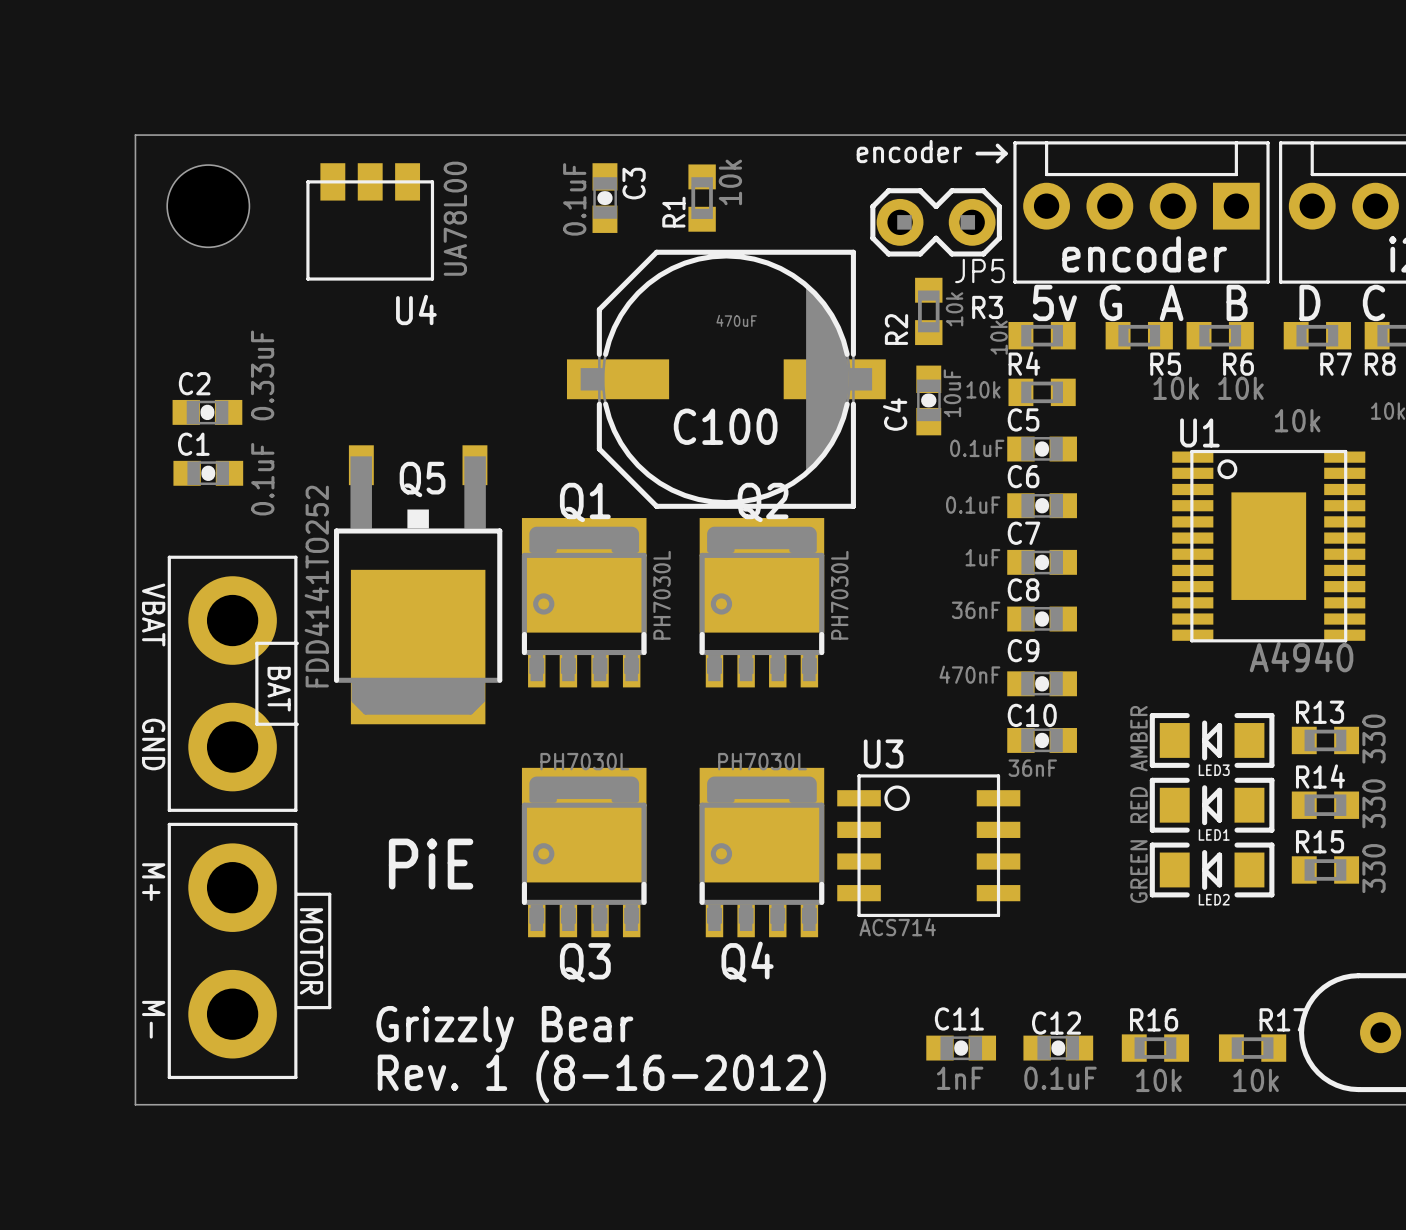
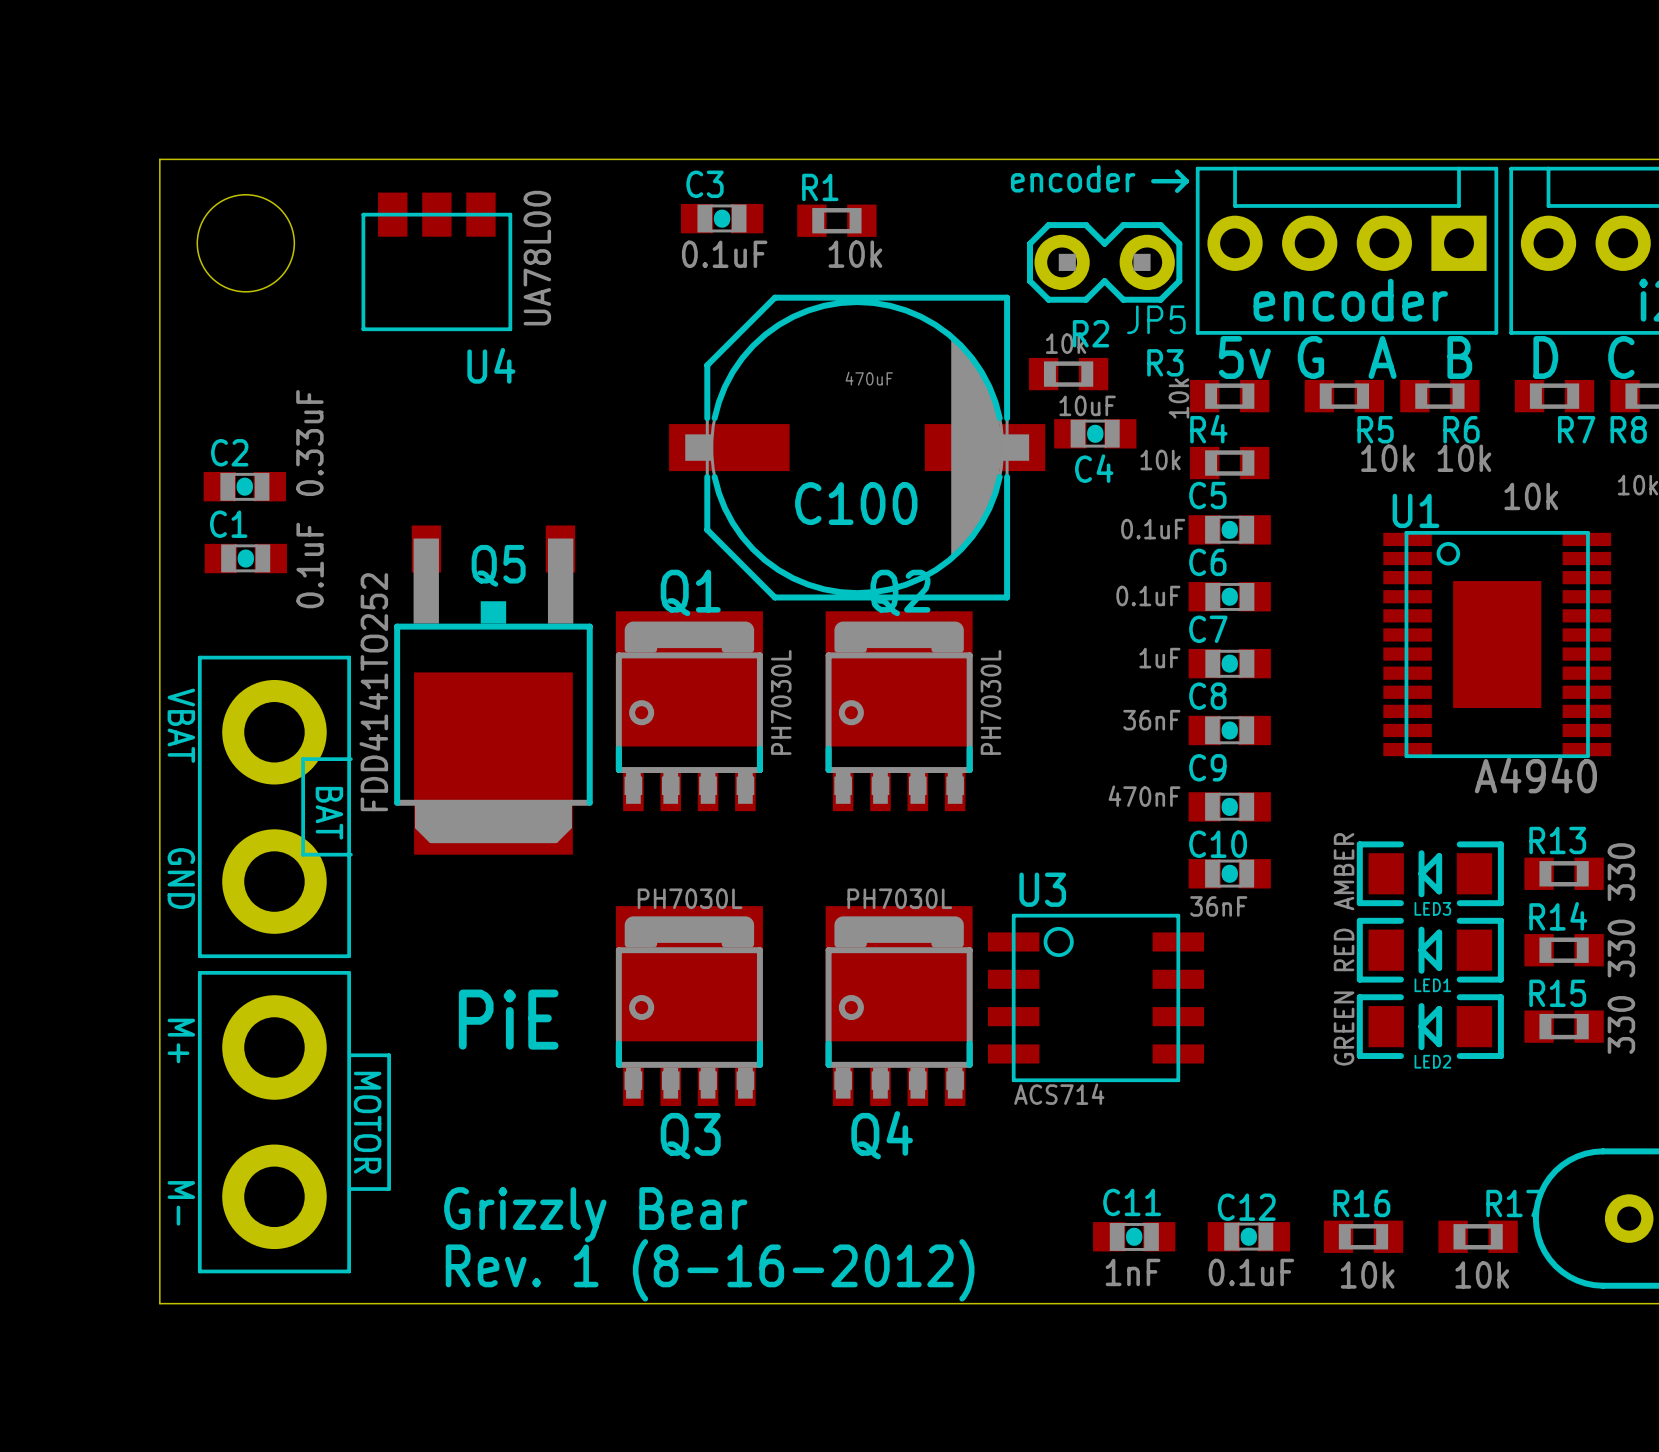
C3 rotation: 0° (604, 198) -> 90° clockwise (722, 218)
R1 rotation: 0° (702, 198) -> 90° clockwise (836, 220)
R2 rotation: 0° (928, 311) -> 90° clockwise (1068, 374)
C4 rotation: 0° (928, 400) -> 90° clockwise (1095, 433)

